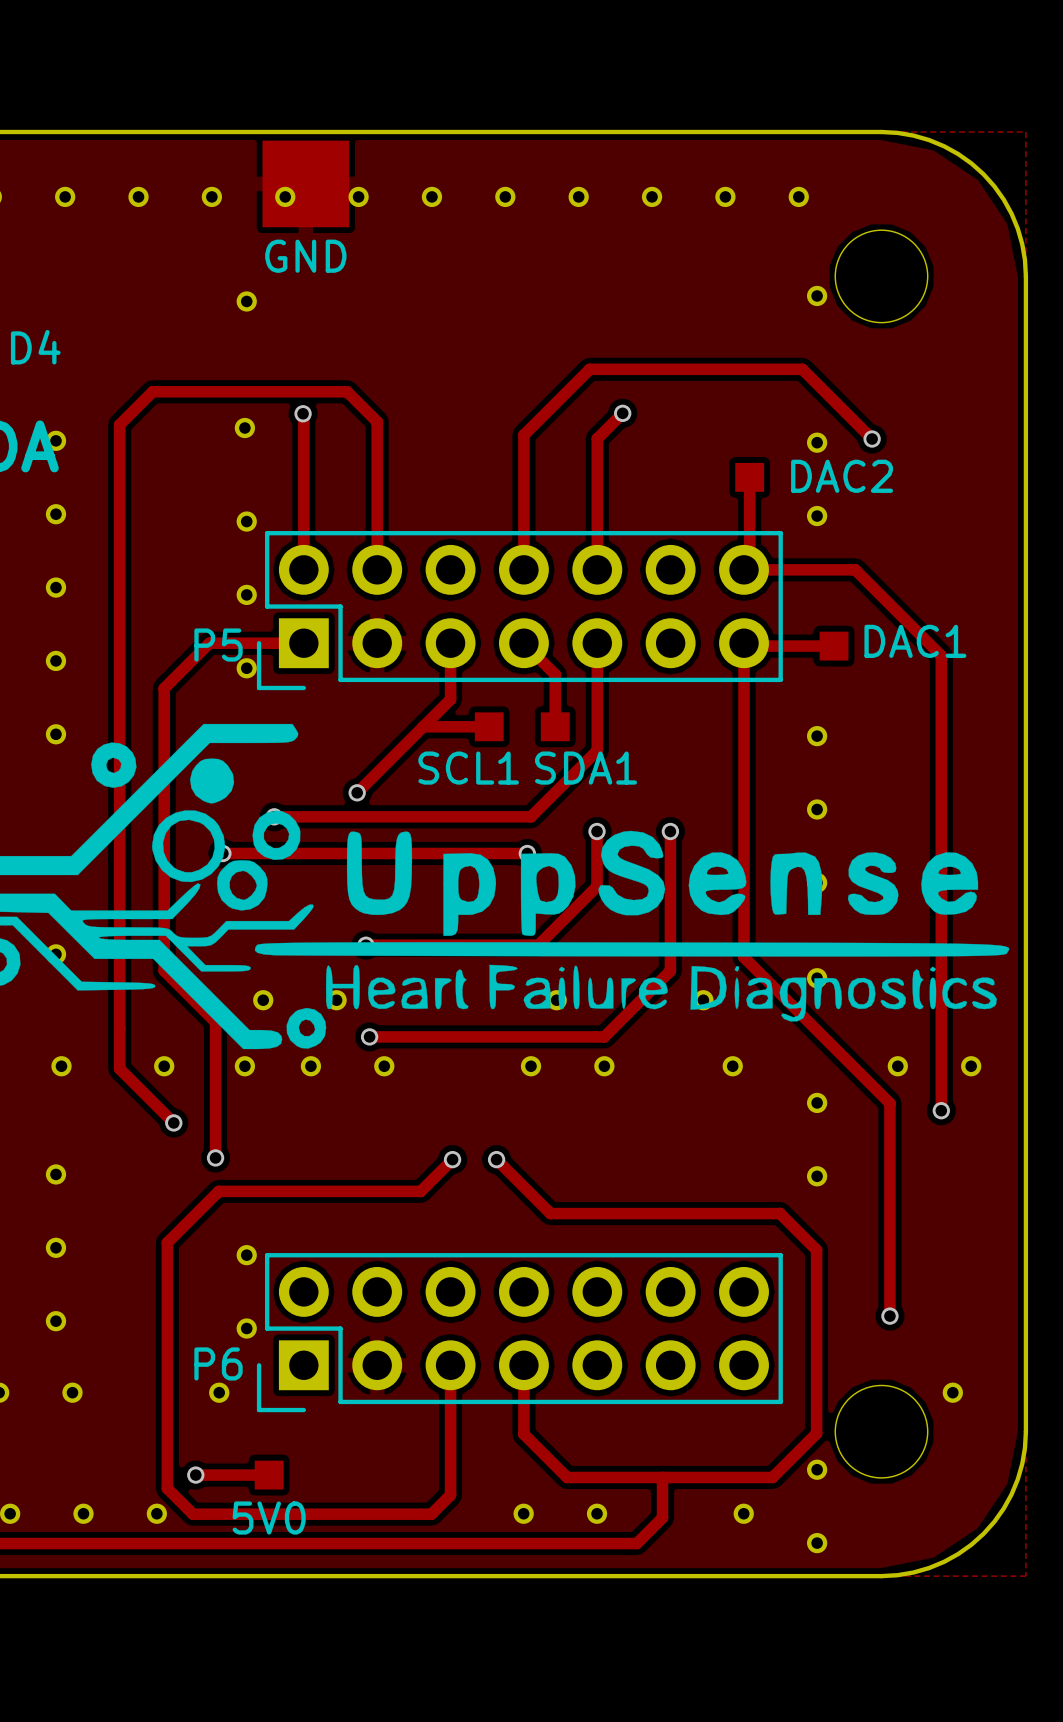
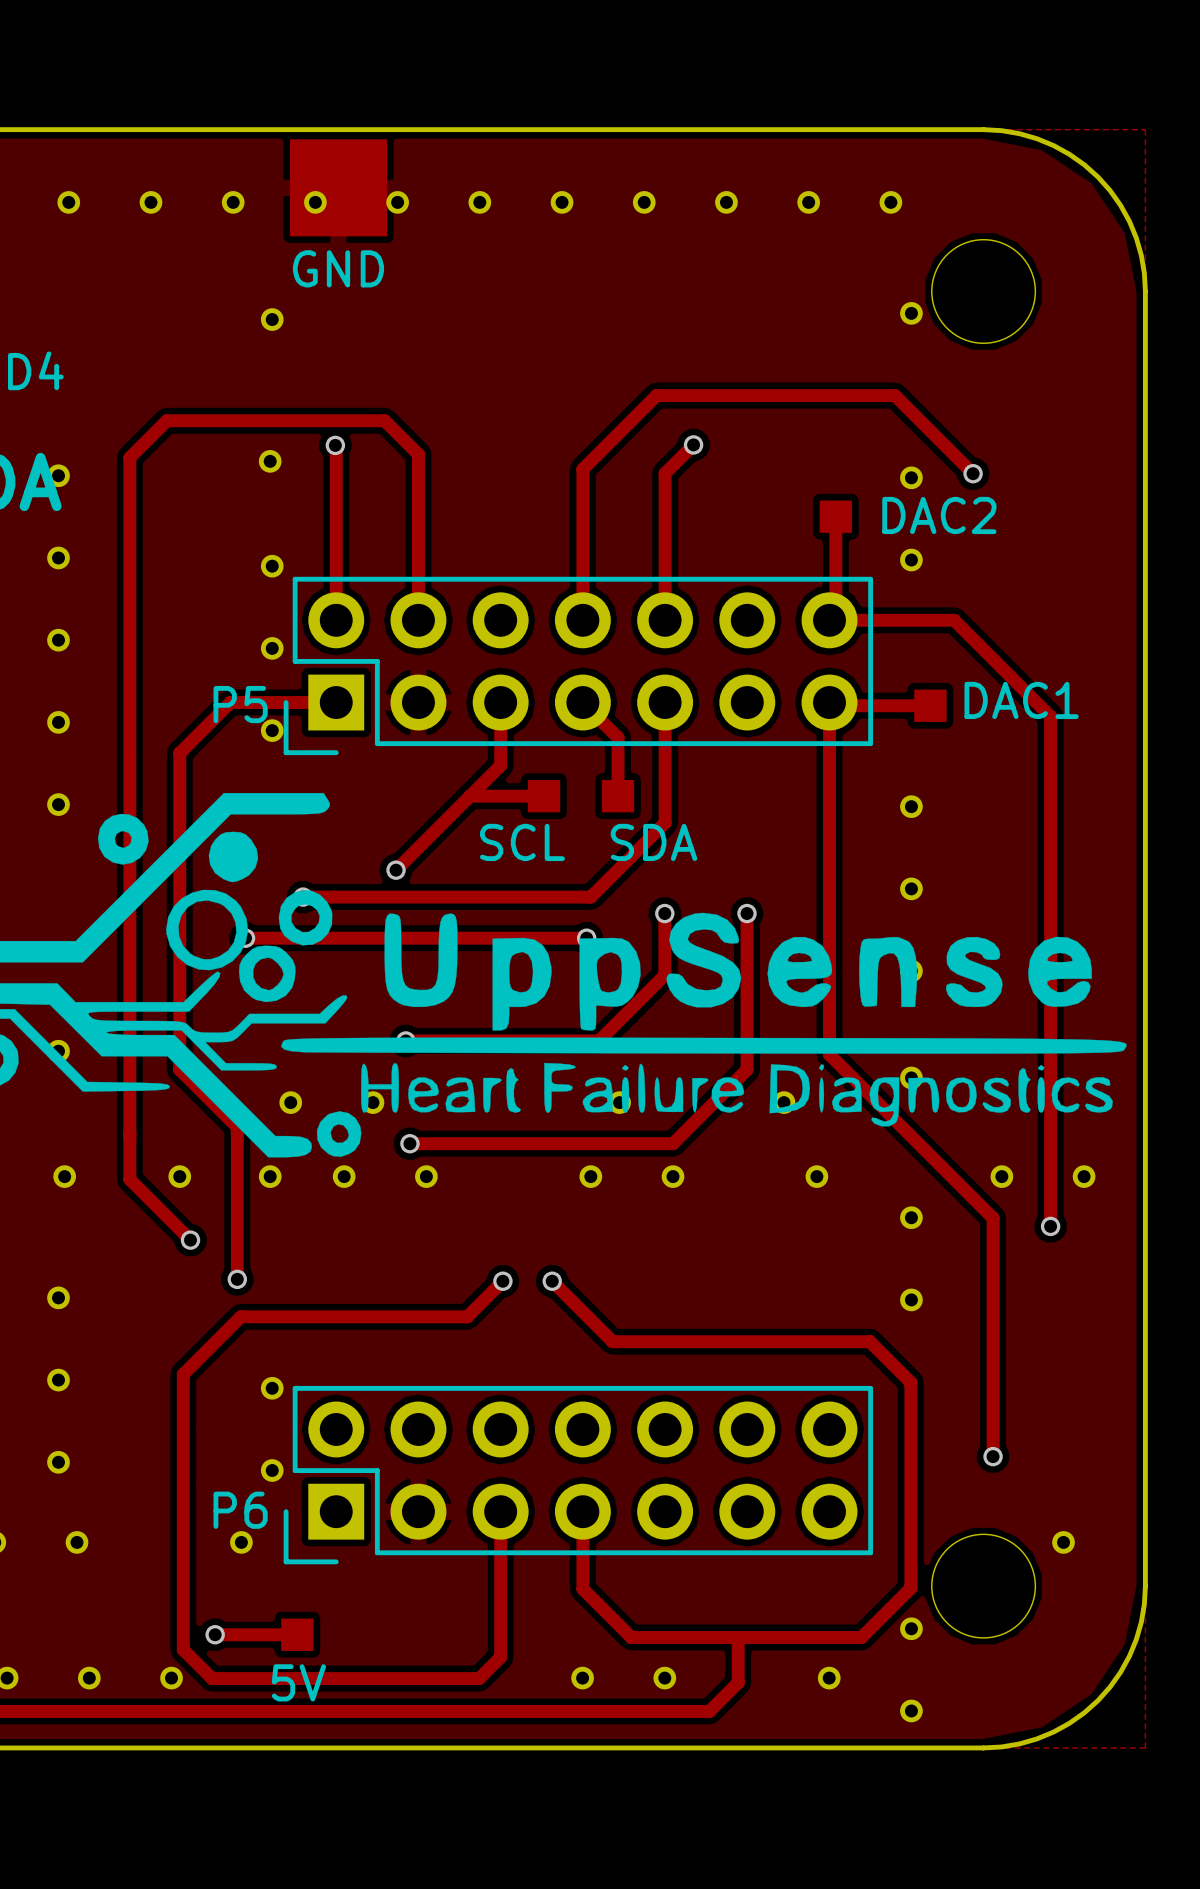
SCL1 name: SCL1 (468, 768) -> SCL (522, 842)
SDA1 name: SDA1 (586, 768) -> SDA (654, 842)
5V0 name: 5V0 (269, 1518) -> 5V (298, 1682)

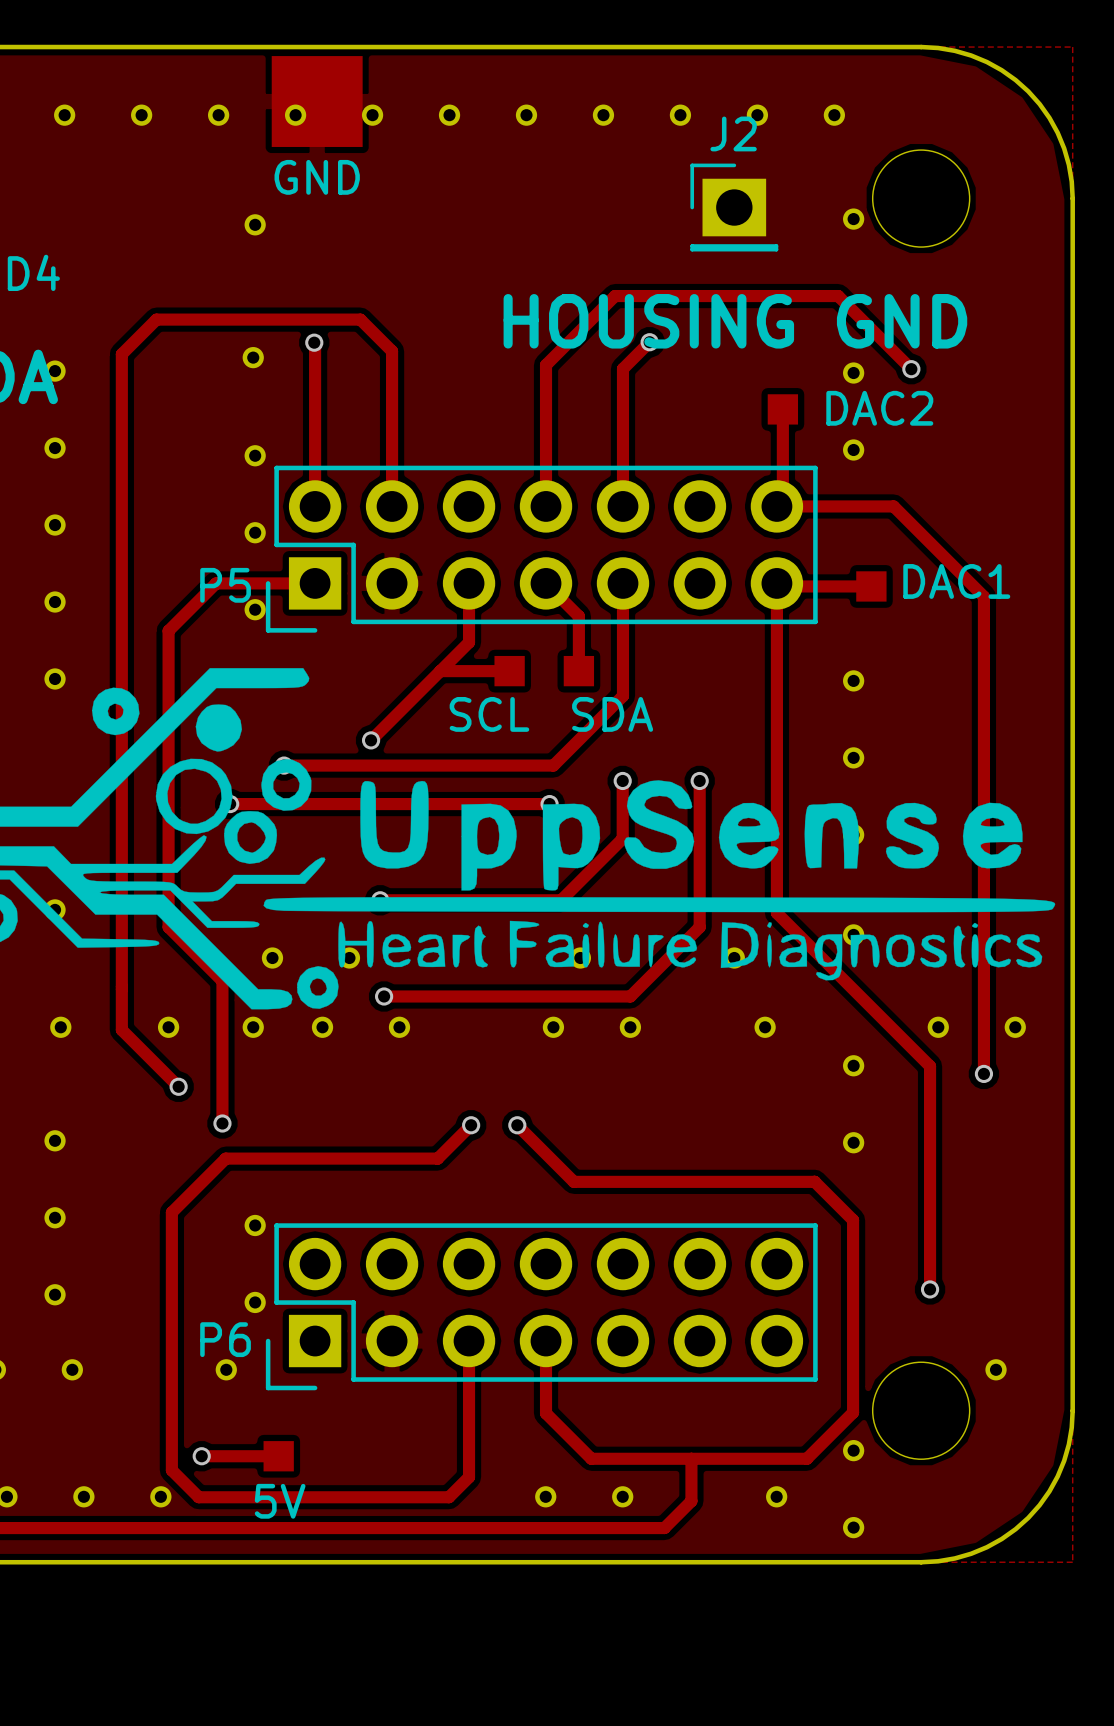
J2: none -> (734, 207)
text: none -> HOUSING GND (735, 321)

